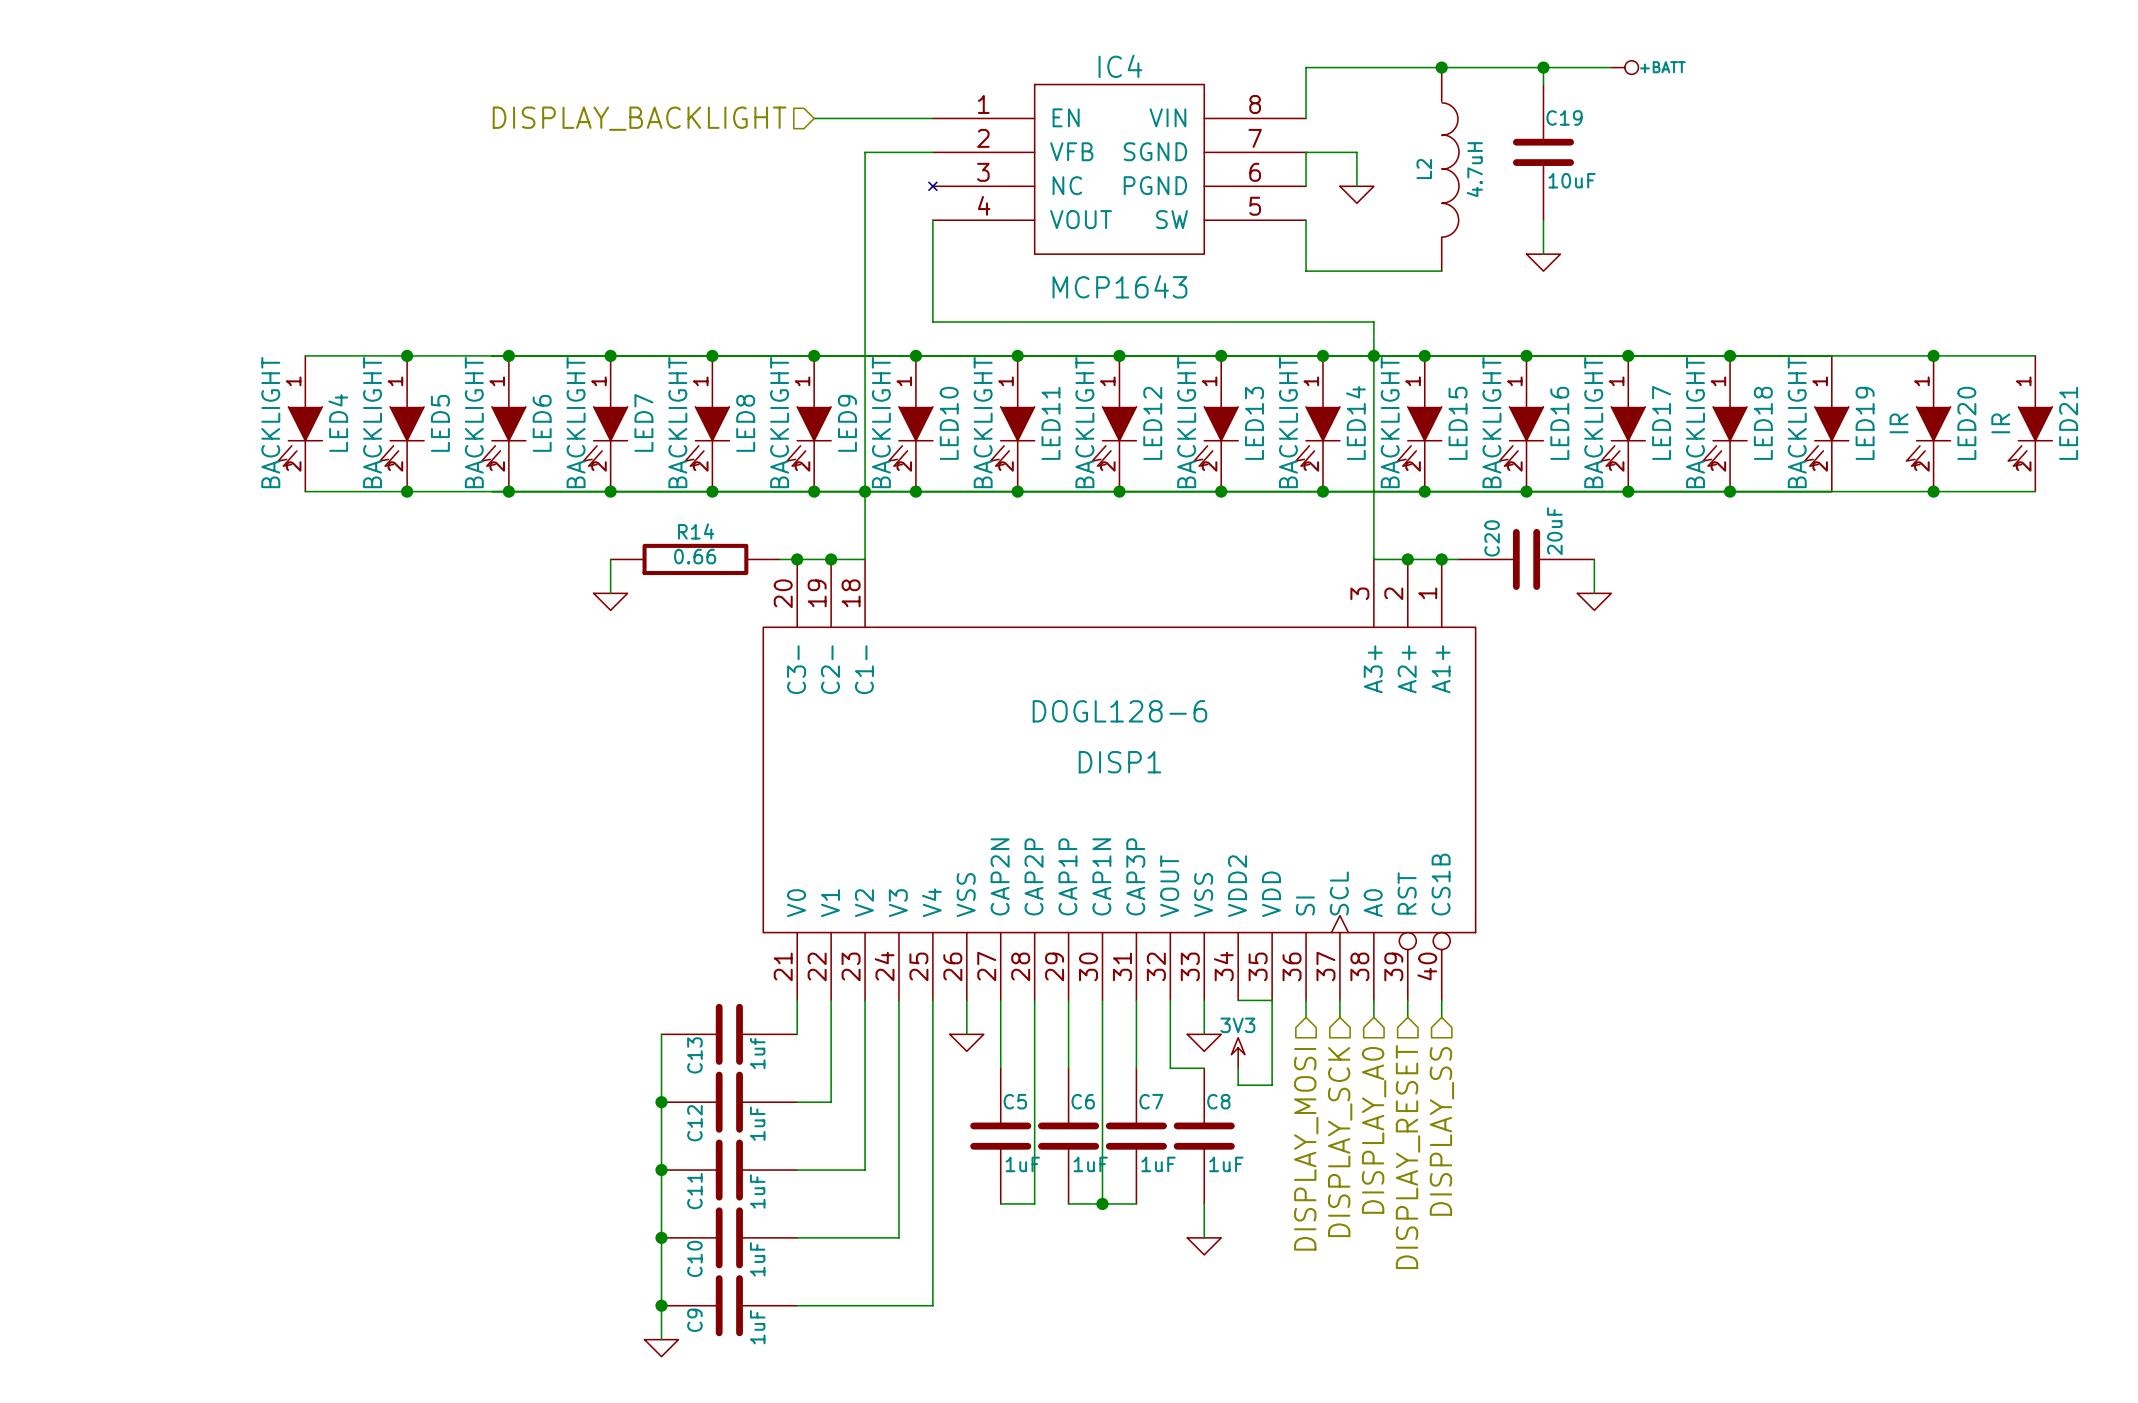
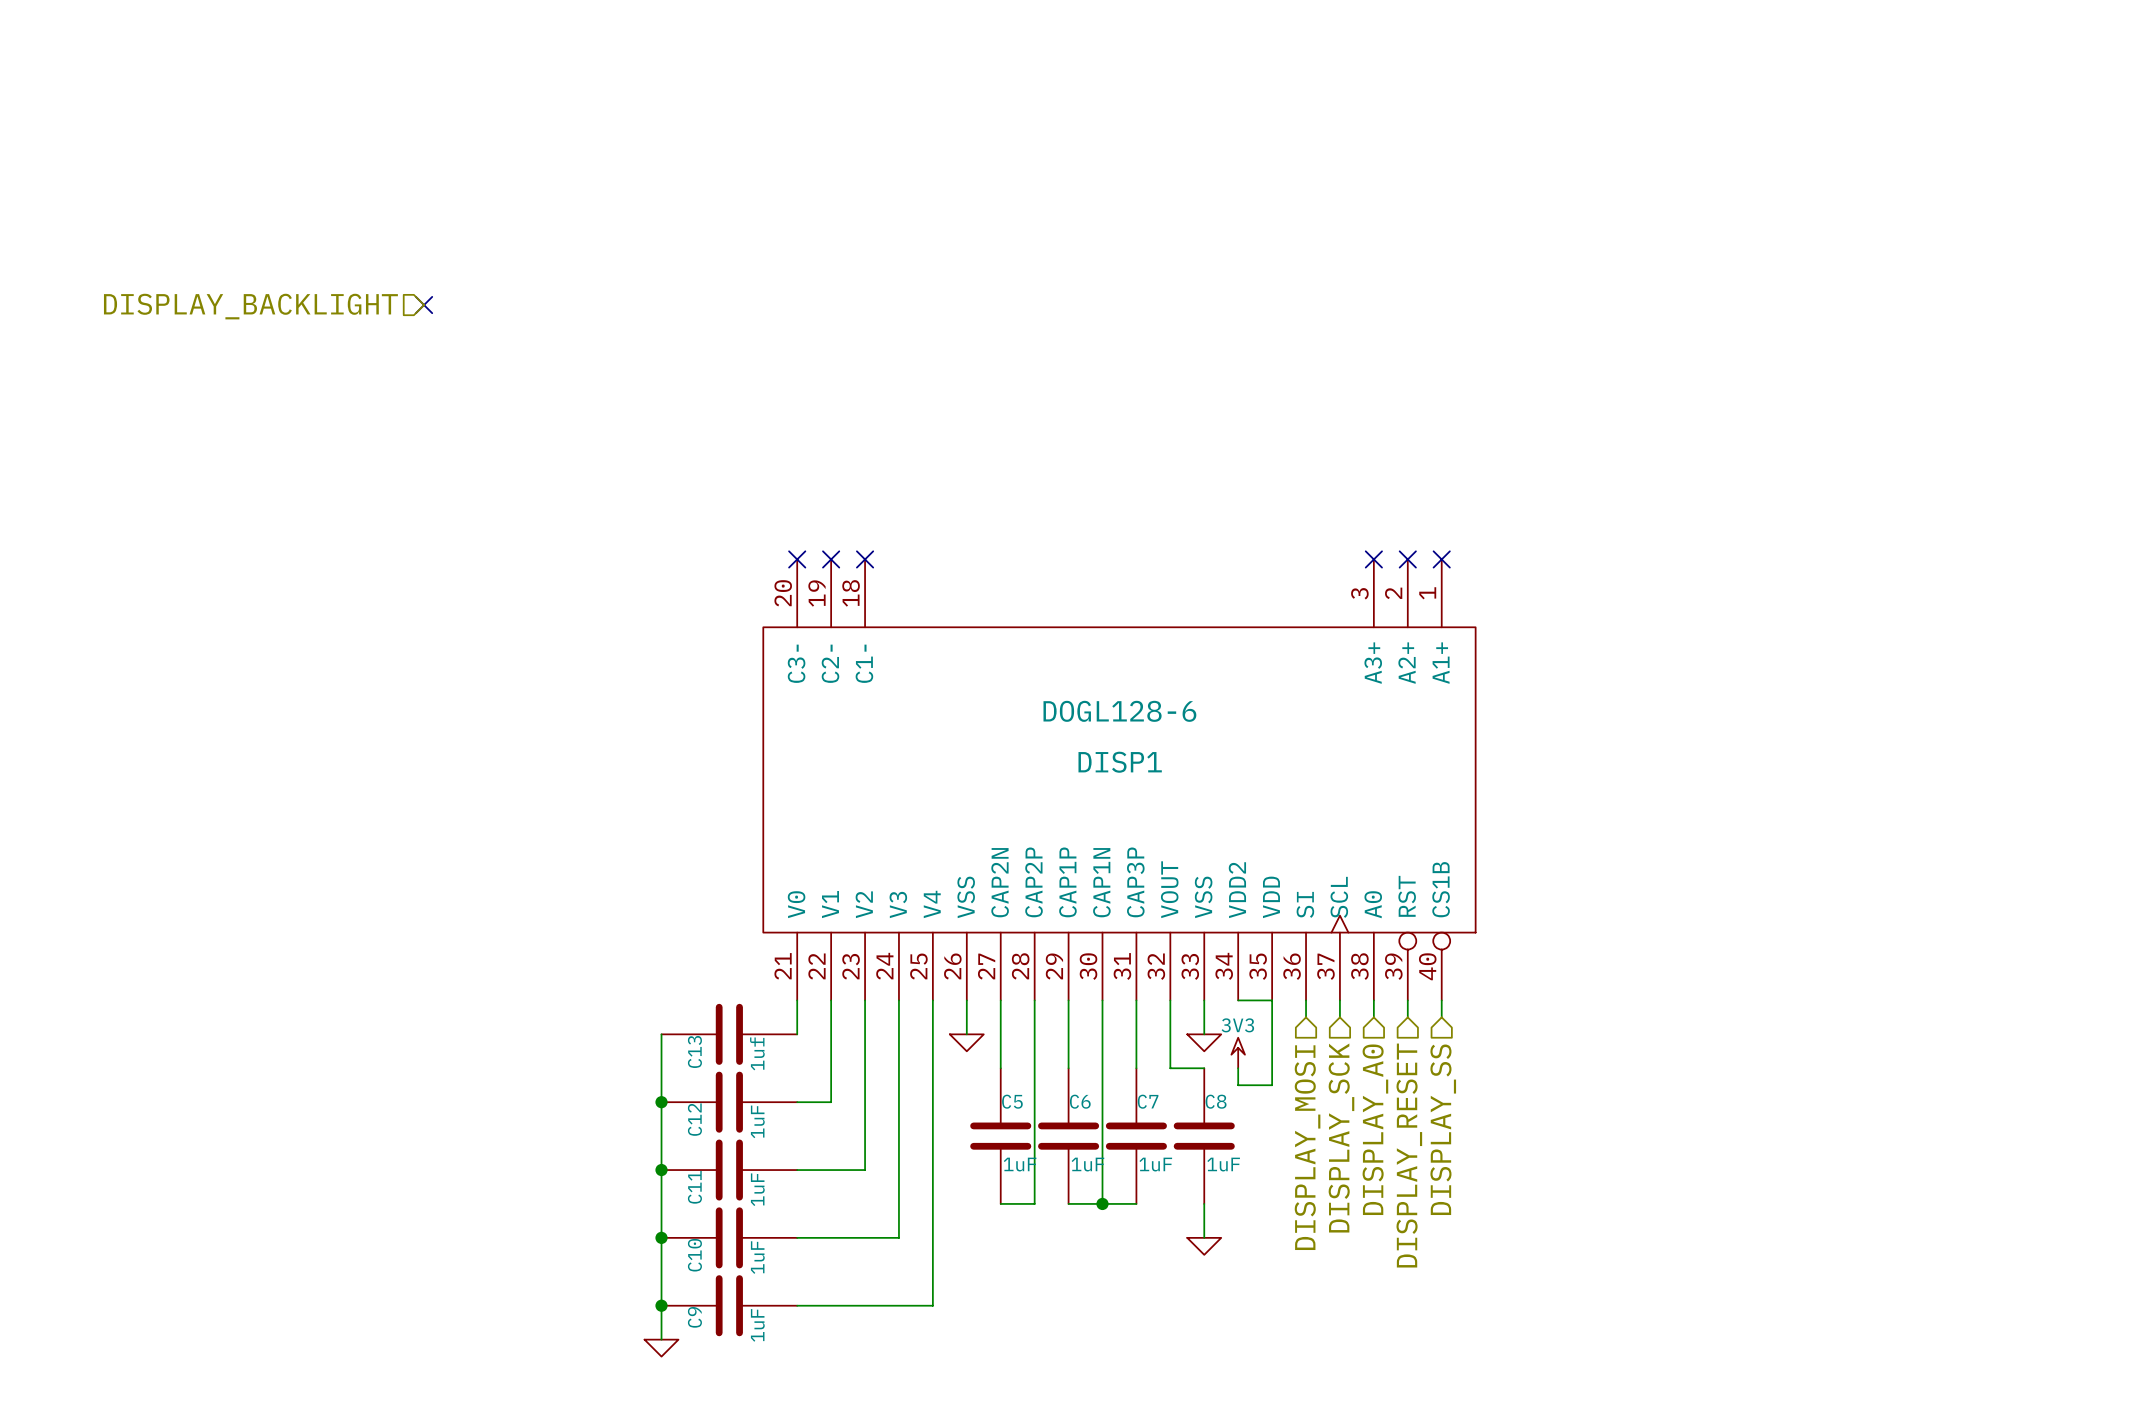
junction: (1441, 67) -> none
wire: (1543, 67) (1543, 84) -> none
junction: (1543, 67) -> none
wire: (1611, 67) (1306, 67) (1306, 118) -> none
power symbol: +BATT (1624, 67) -> none
hierarchical label: DISPLAY_BACKLIGHT (639, 118) -> none
wire: (814, 118) (932, 118) -> none
wire: (932, 152) (865, 152) (865, 559) (780, 559) -> none
C19: 10uF (1543, 152) -> none
IC4: MCP1643 (1117, 169) -> none
L2: 4.7uH (1450, 169) -> none
wire: (1306, 186) (1306, 152) (1356, 152) (1356, 186) -> none
power symbol: (1356, 194) -> none
wire: (932, 220) (932, 321) (1373, 321) (1373, 559) (1458, 559) -> none
wire: (1306, 220) (1306, 271) (1441, 271) -> none
wire: (1543, 220) (1543, 254) -> none
power symbol: (1543, 262) -> none
hierarchical label: none -> DISPLAY_BACKLIGHT (250, 306)
no-connect mark: none -> (424, 305)
wire: (305, 355) (2035, 355) -> none
junction: (407, 355) -> none
junction: (508, 355) -> none
junction: (610, 355) -> none
junction: (712, 355) -> none
junction: (814, 355) -> none
junction: (915, 355) -> none
junction: (1017, 355) -> none
junction: (1119, 355) -> none
junction: (1221, 355) -> none
junction: (1322, 355) -> none
junction: (1373, 355) -> none
junction: (1424, 355) -> none
junction: (1526, 355) -> none
junction: (1628, 355) -> none
junction: (1730, 355) -> none
junction: (1933, 355) -> none
LED4: BACKLIGHT (300, 423) -> none
LED5: BACKLIGHT (402, 423) -> none
LED6: BACKLIGHT (503, 423) -> none
LED7: BACKLIGHT (605, 423) -> none
LED8: BACKLIGHT (707, 423) -> none
LED9: BACKLIGHT (809, 423) -> none
LED10: BACKLIGHT (910, 423) -> none
LED11: BACKLIGHT (1012, 423) -> none
LED12: BACKLIGHT (1114, 423) -> none
LED13: BACKLIGHT (1216, 423) -> none
LED14: BACKLIGHT (1317, 423) -> none
LED15: BACKLIGHT (1419, 423) -> none
LED16: BACKLIGHT (1521, 423) -> none
LED17: BACKLIGHT (1623, 423) -> none
LED18: BACKLIGHT (1724, 423) -> none
LED19: BACKLIGHT (1826, 423) -> none
LED20: IR (1928, 423) -> none
LED21: IR (2030, 423) -> none
wire: (305, 491) (2035, 491) -> none
junction: (407, 491) -> none
junction: (508, 491) -> none
junction: (610, 491) -> none
junction: (712, 491) -> none
junction: (814, 491) -> none
junction: (865, 491) -> none
junction: (915, 491) -> none
junction: (1017, 491) -> none
junction: (1119, 491) -> none
junction: (1221, 491) -> none
junction: (1322, 491) -> none
junction: (1424, 491) -> none
junction: (1526, 491) -> none
junction: (1628, 491) -> none
junction: (1730, 491) -> none
junction: (1933, 491) -> none
wire: (610, 559) (610, 593) -> none
R14: 0.66 (695, 559) -> none
junction: (797, 559) -> none
no-connect mark: none -> (797, 559)
junction: (831, 559) -> none
no-connect mark: none -> (831, 559)
no-connect mark: none -> (865, 559)
no-connect mark: none -> (1373, 559)
junction: (1407, 559) -> none
no-connect mark: none -> (1407, 559)
junction: (1441, 559) -> none
no-connect mark: none -> (1441, 559)
C20: 20uF (1526, 559) -> none
wire: (1594, 559) (1594, 593) -> none
power symbol: (610, 601) -> none
power symbol: (1594, 601) -> none

